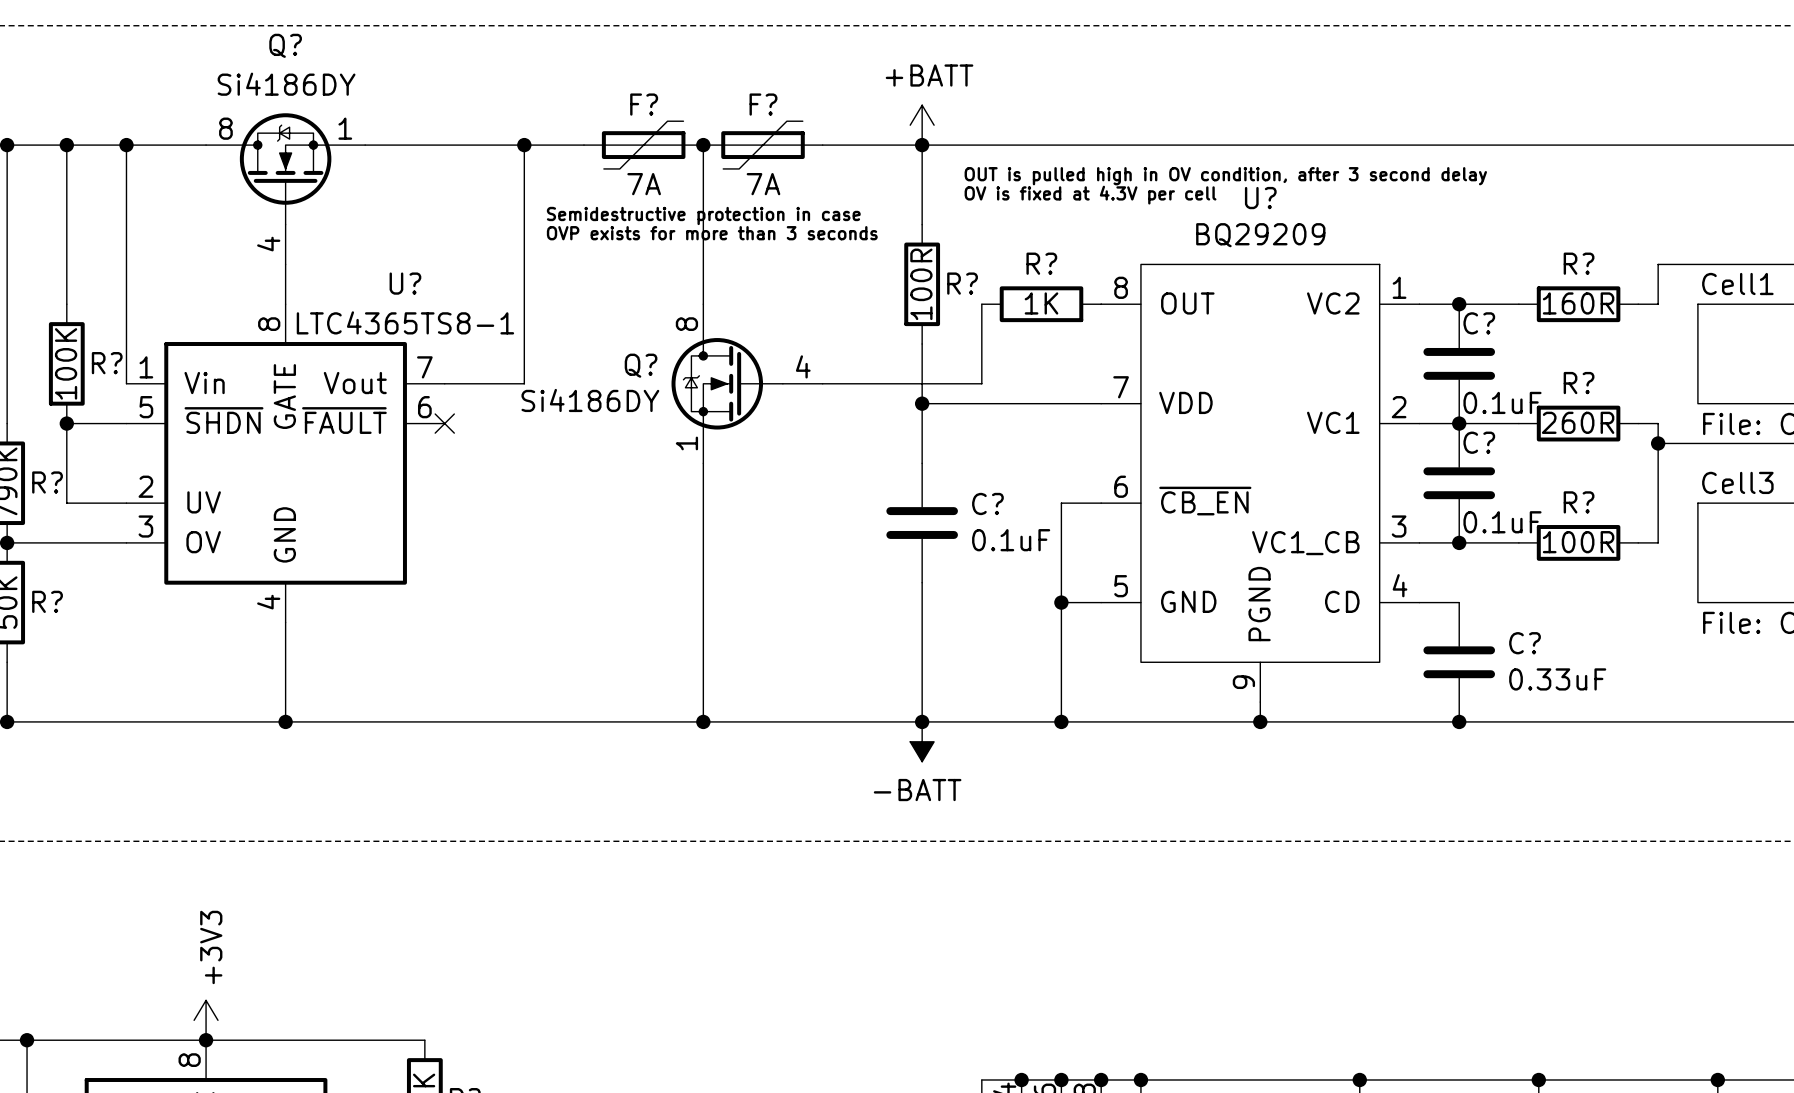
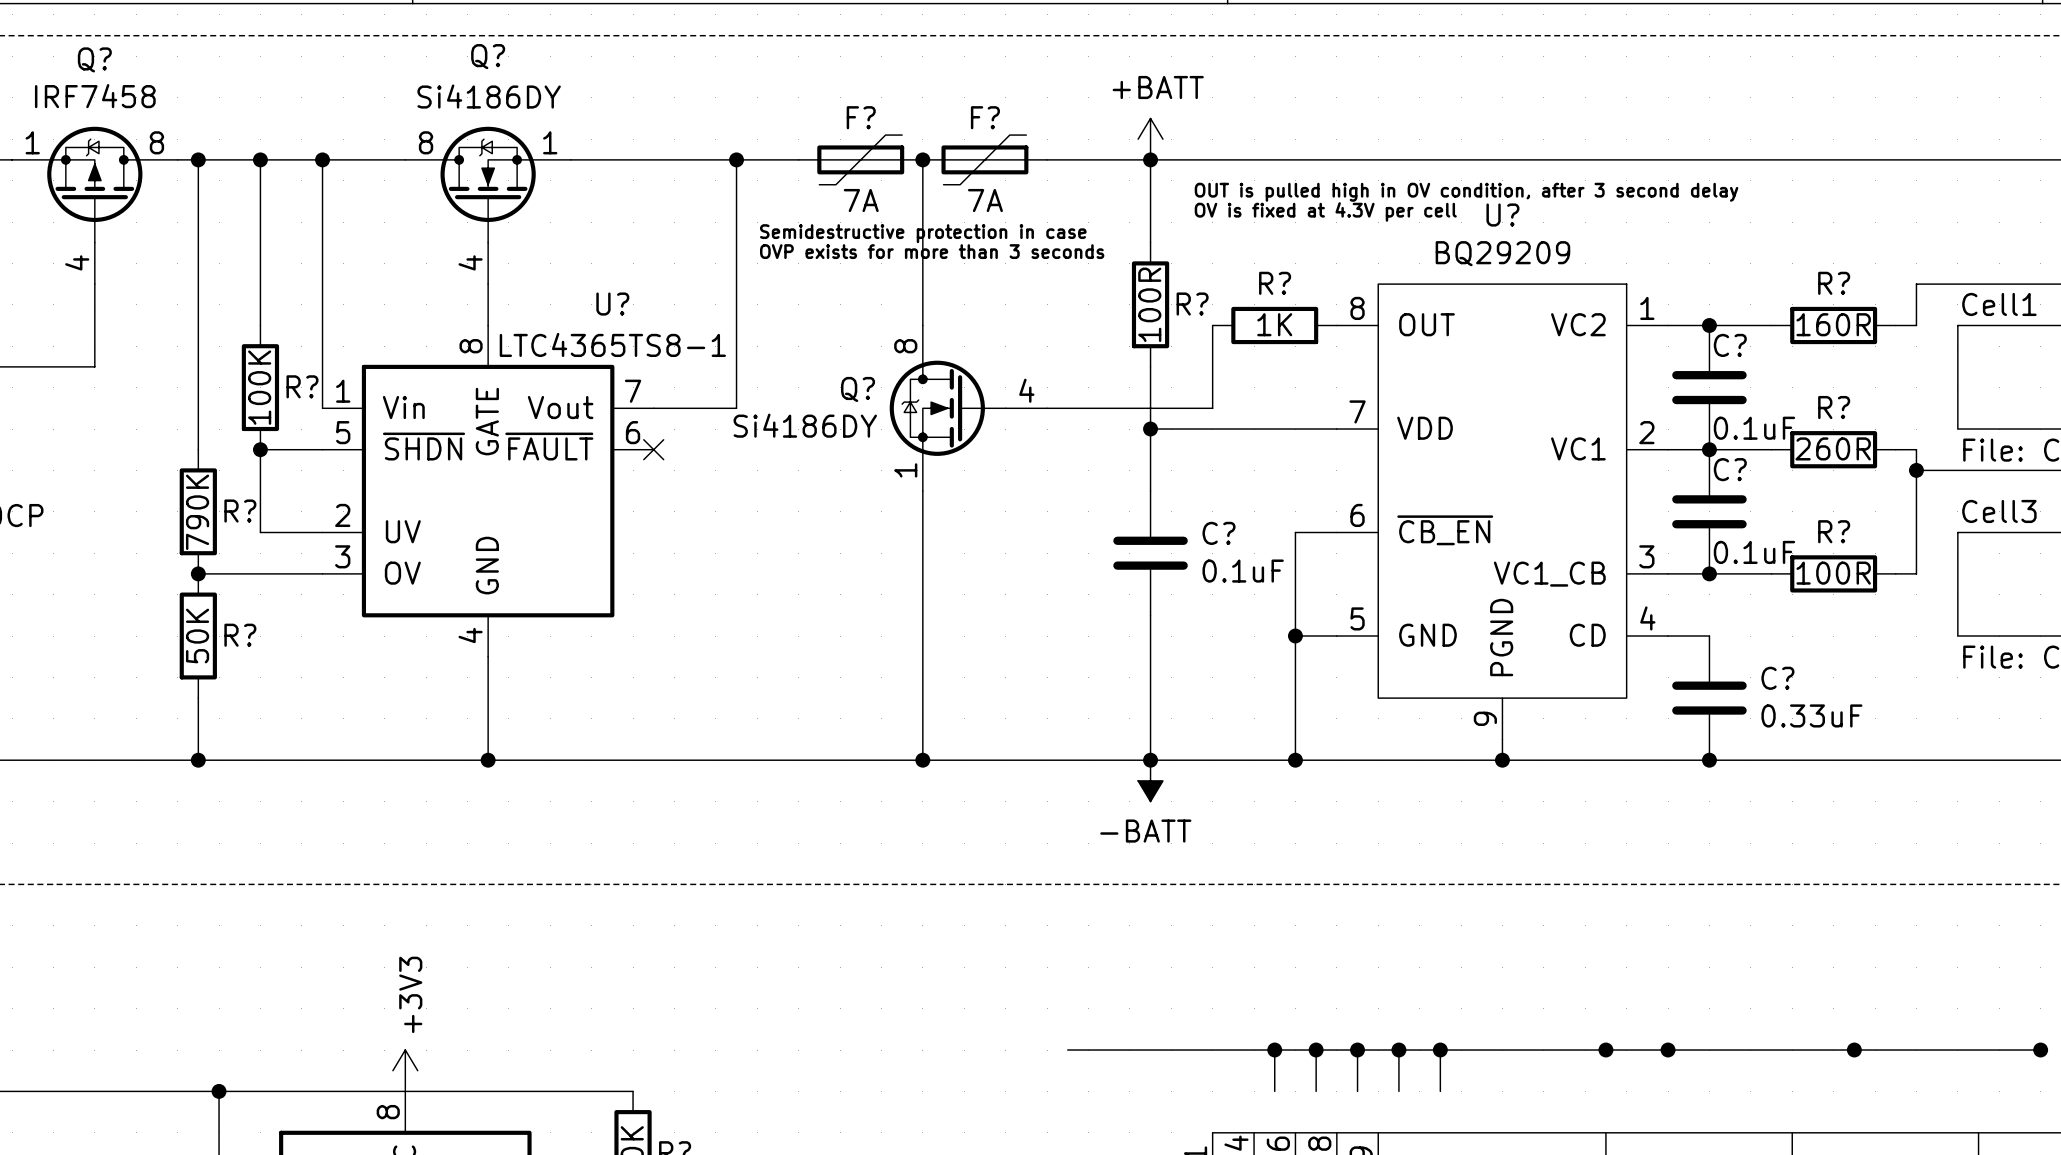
wire: none -> (1067, 1050) (2040, 1050)
wire: none -> (1274, 1050) (1274, 1091)
junction: none -> (1274, 1050)
wire: none -> (1316, 1050) (1316, 1091)
junction: none -> (1316, 1050)
wire: none -> (1357, 1050) (1357, 1091)
junction: none -> (1357, 1050)
wire: none -> (1398, 1050) (1398, 1091)
junction: none -> (1398, 1050)
wire: none -> (1440, 1050) (1440, 1091)
junction: none -> (1440, 1050)
junction: none -> (1605, 1050)
junction: none -> (1668, 1050)
junction: none -> (1854, 1050)
junction: none -> (2040, 1050)
junction: (206, 1040) -> none
junction: (1021, 1079) -> none
junction: (1061, 1079) -> none
junction: (1101, 1079) -> none
junction: (1140, 1079) -> none
junction: (1359, 1079) -> none
junction: (1538, 1079) -> none
junction: (1717, 1079) -> none

